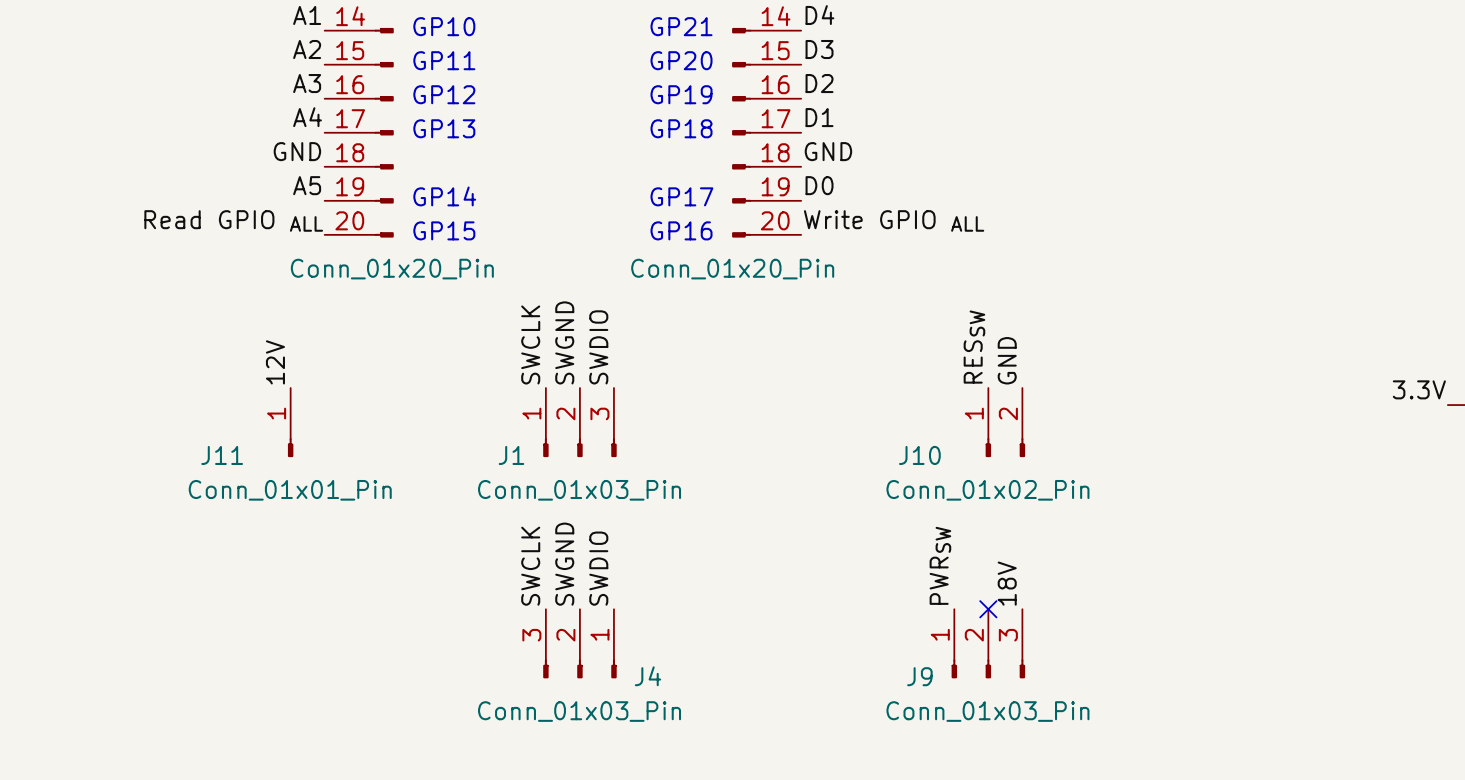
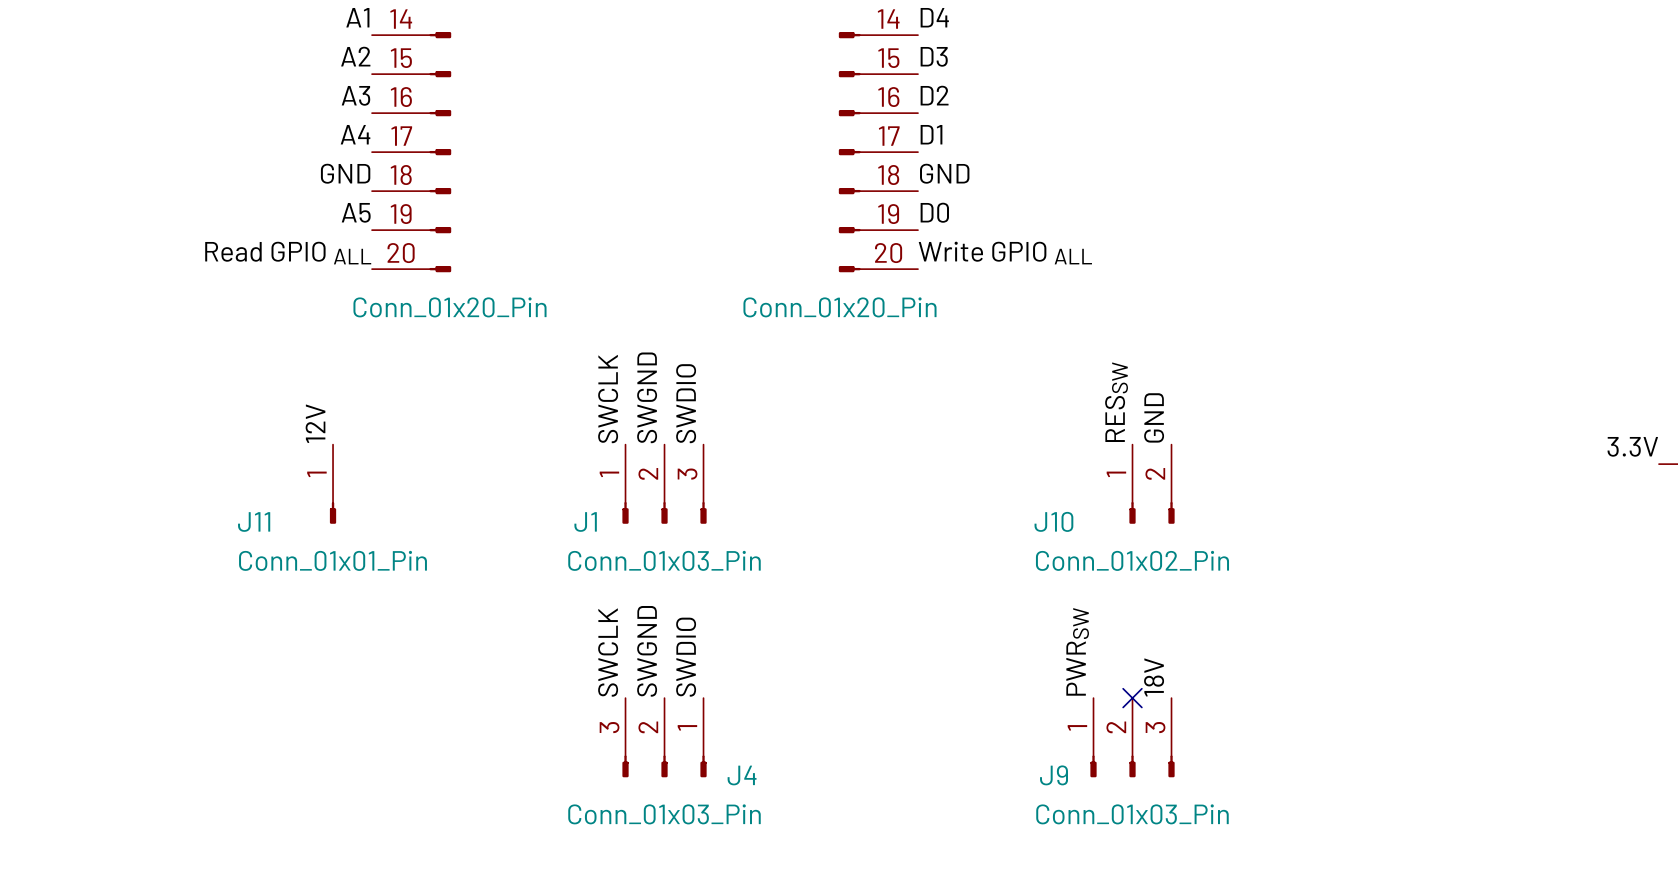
text: GP10 (444, 26) -> none
text: GP21 (681, 26) -> none
text: GP11 (444, 60) -> none
text: GP20 (681, 60) -> none
text: GP12 (444, 94) -> none
text: GP19 (681, 94) -> none
text: GP13 (444, 128) -> none
text: GP18 (681, 128) -> none
text: GP14 (444, 196) -> none
text: GP17 (681, 196) -> none
text: GP15 (444, 230) -> none
text: GP16 (681, 230) -> none

